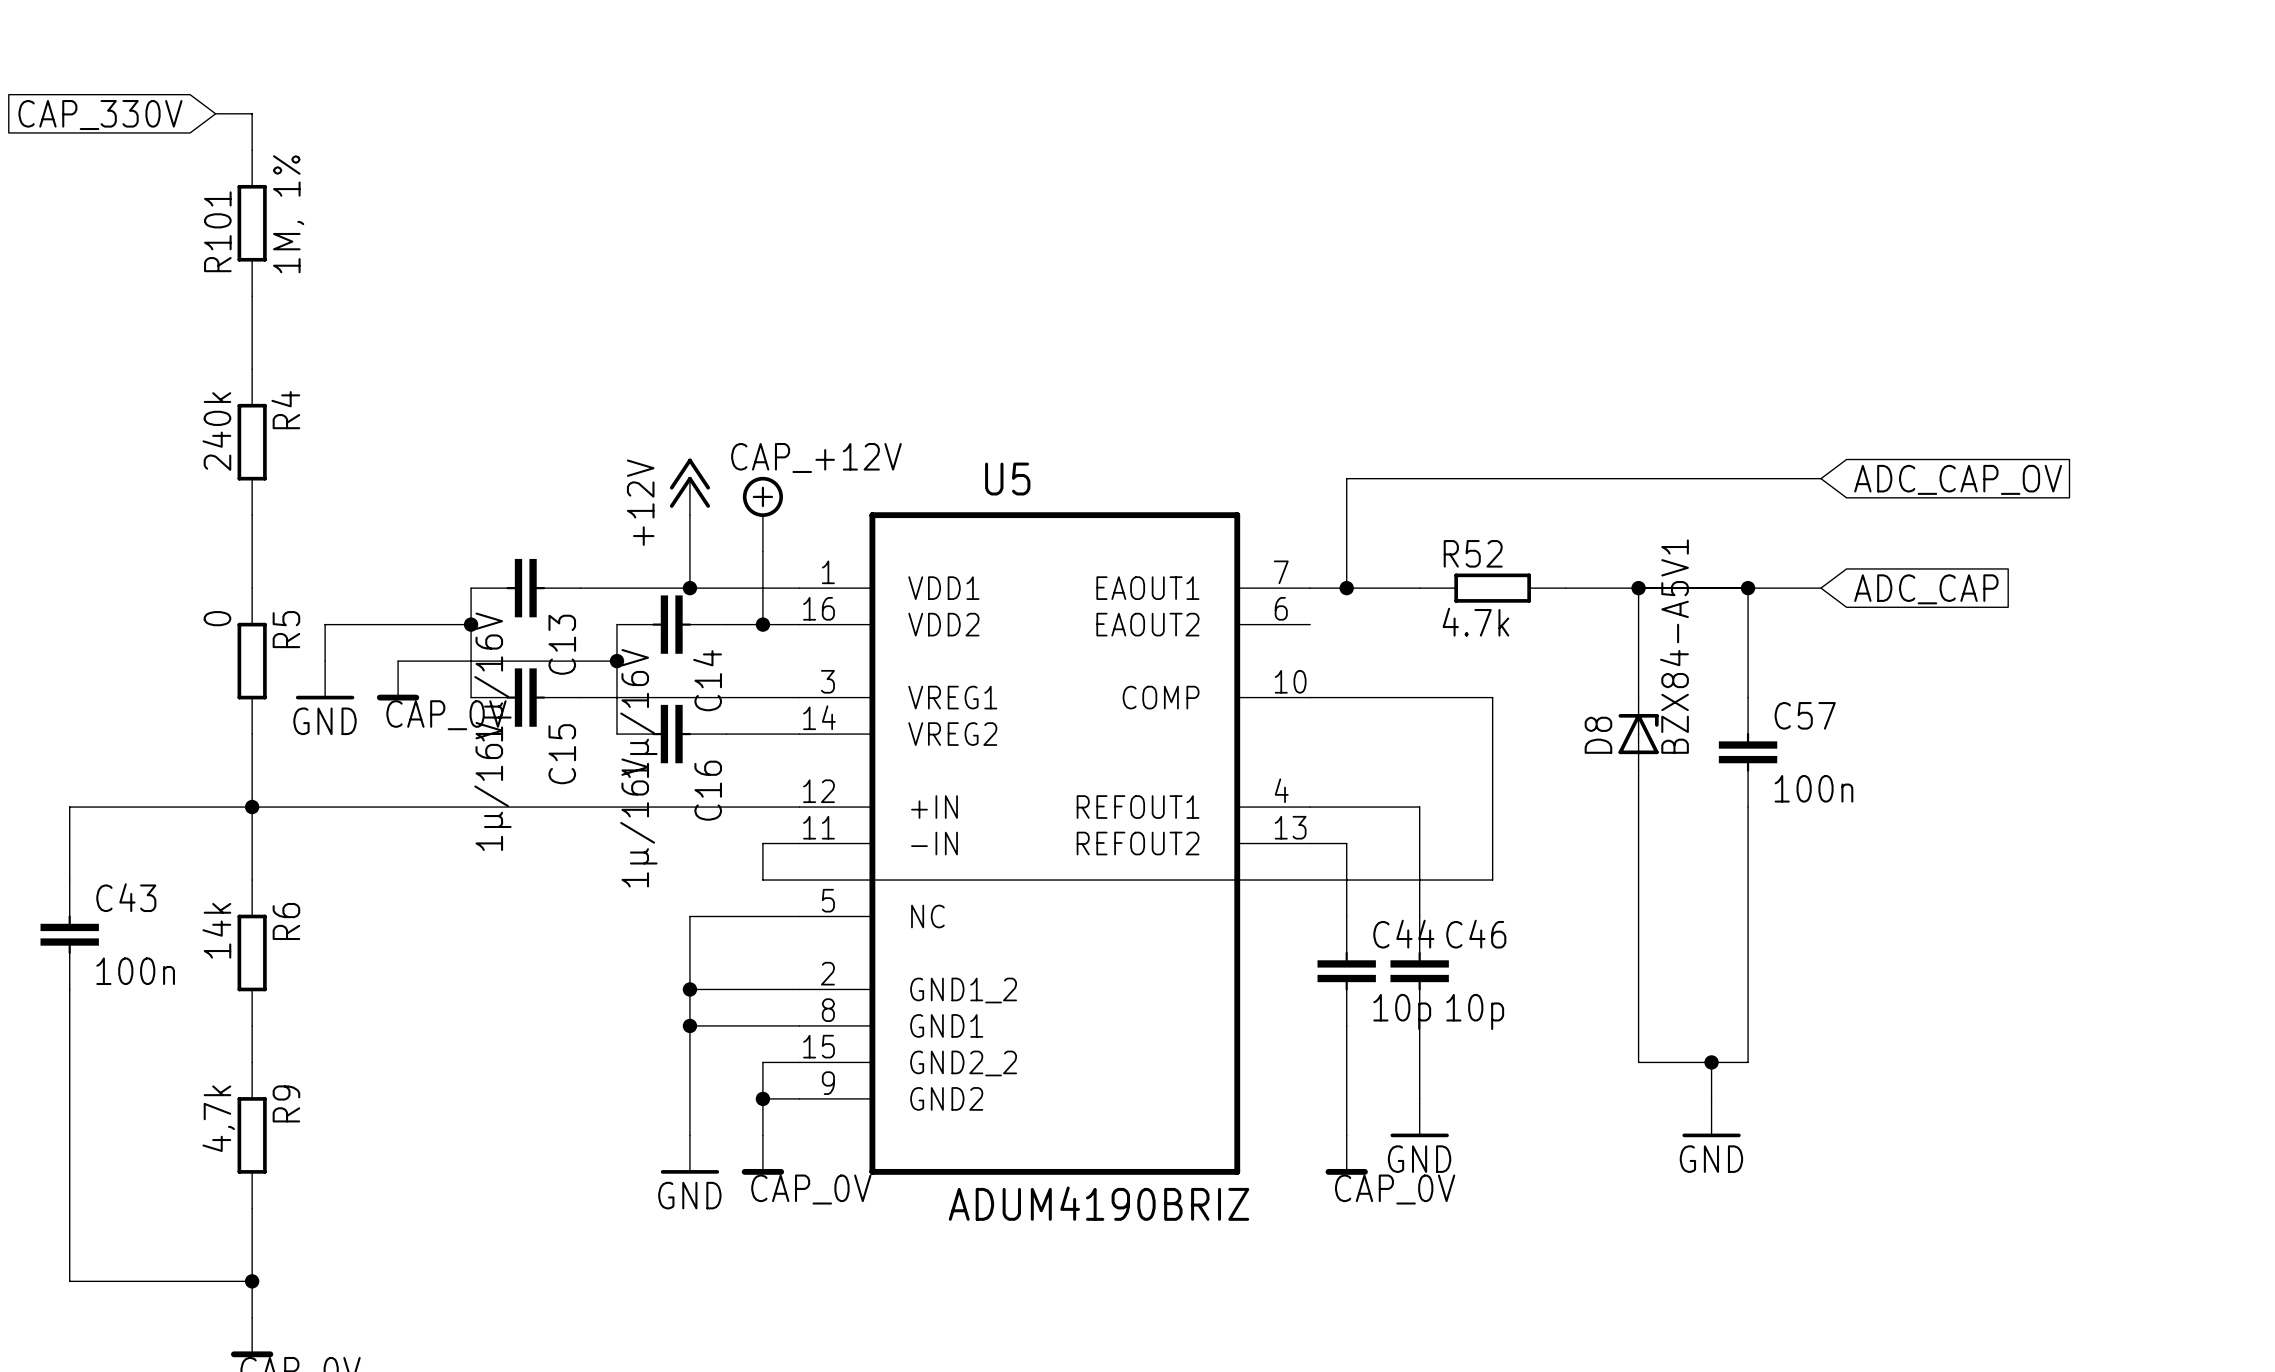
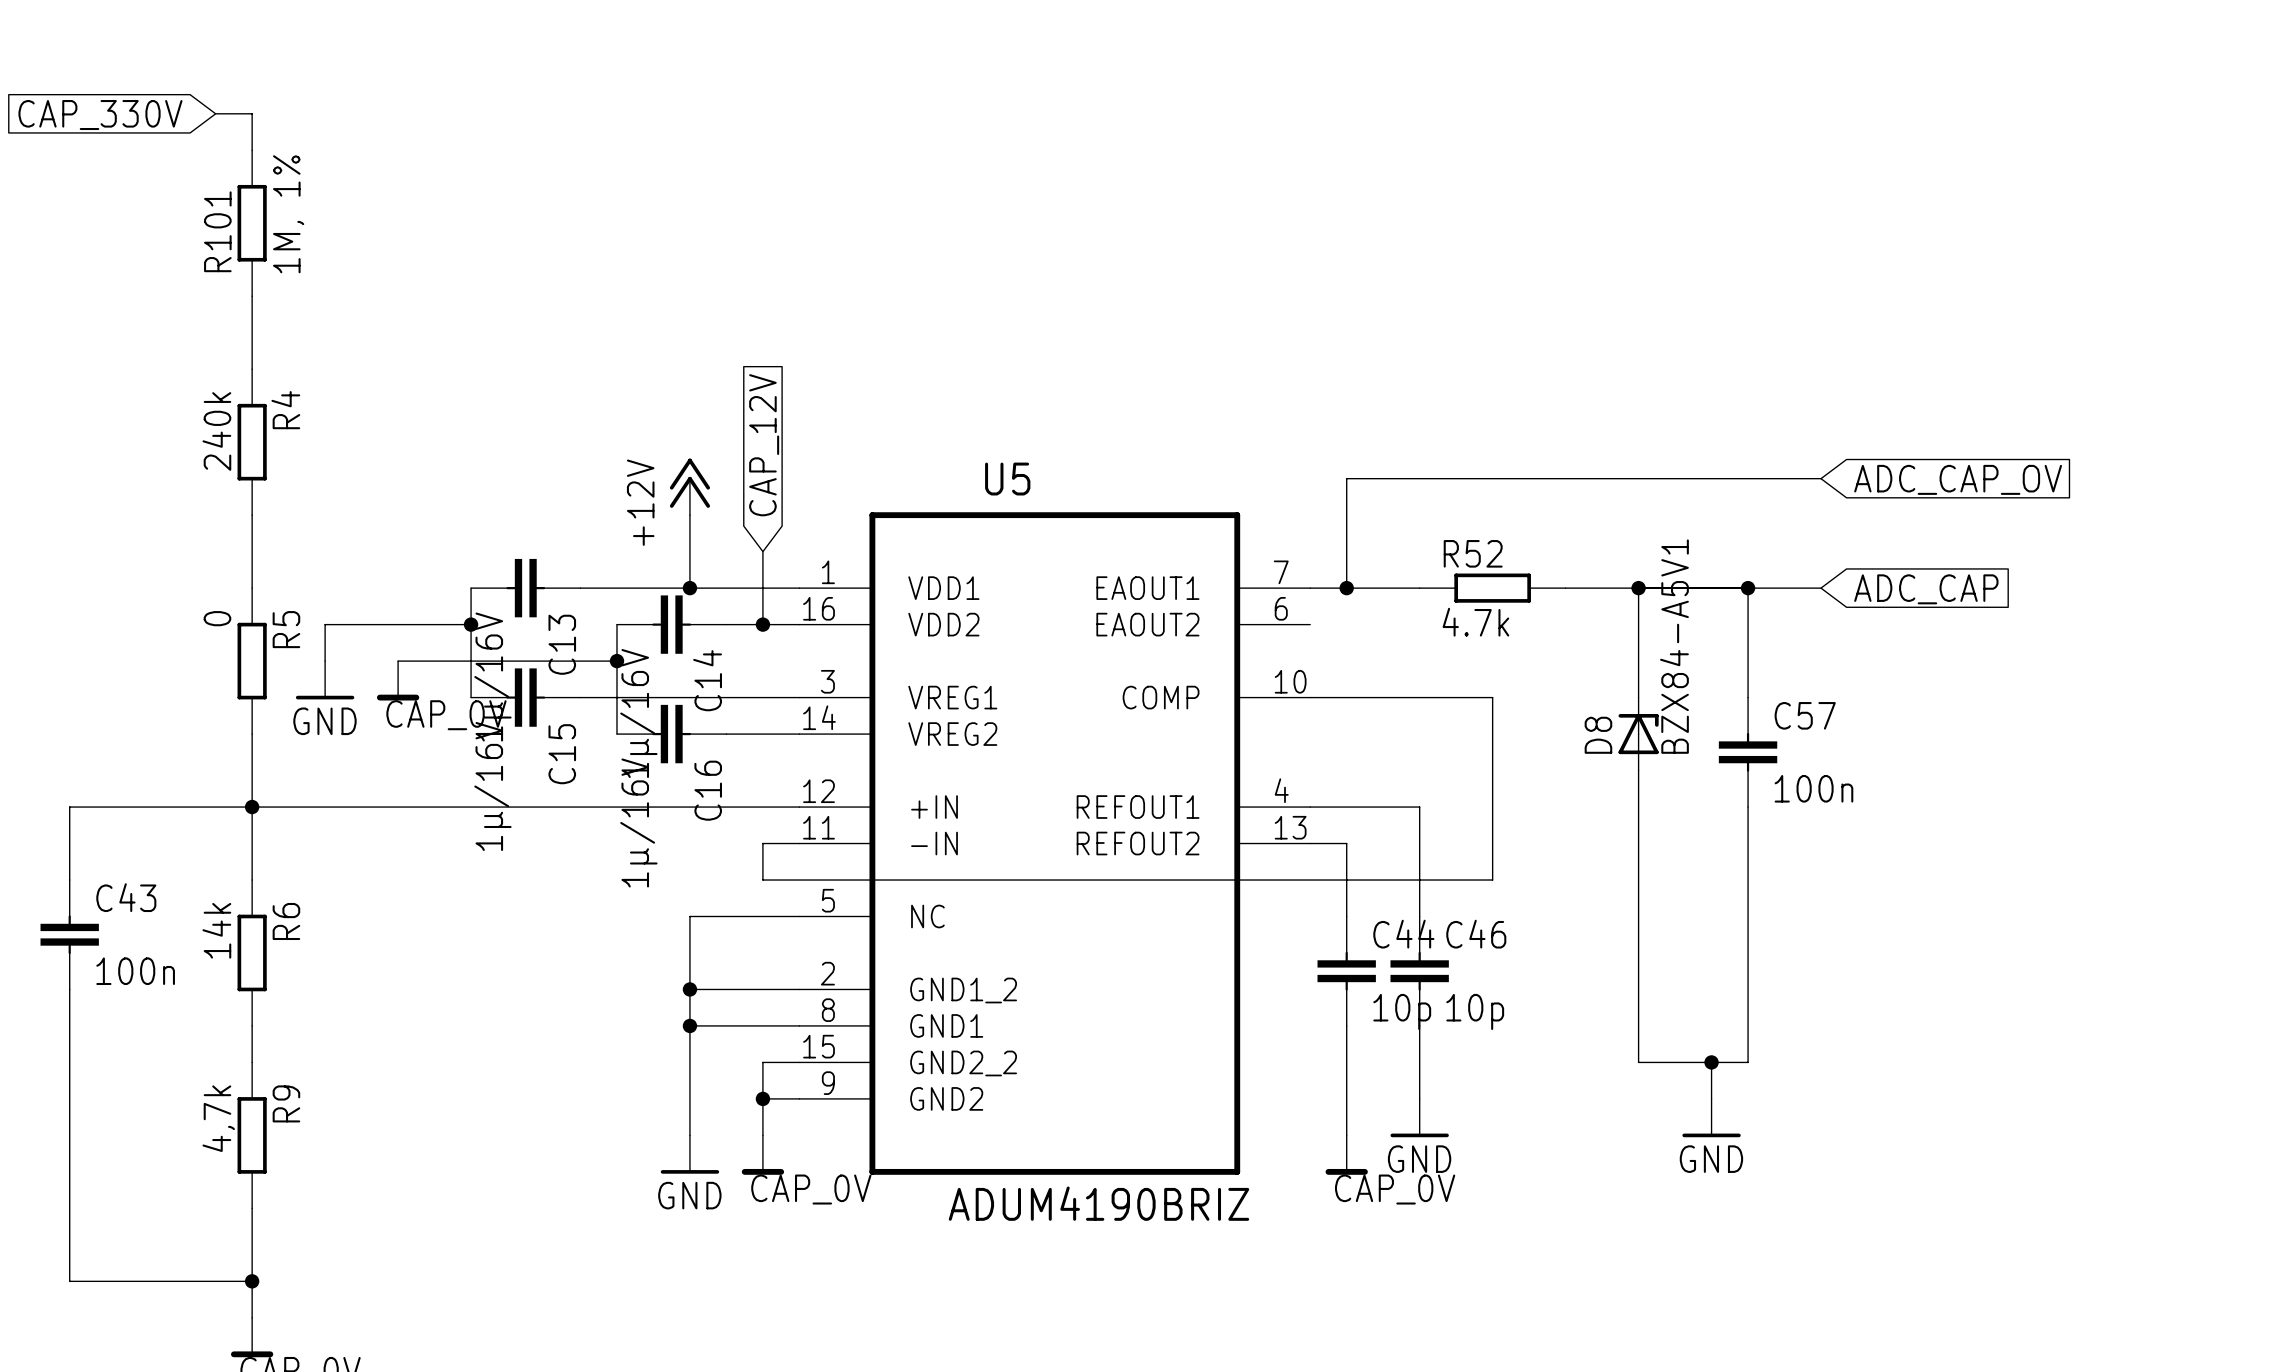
global label: none -> CAP_12V (764, 445)
power symbol: CAP_+12V (762, 514) -> none

